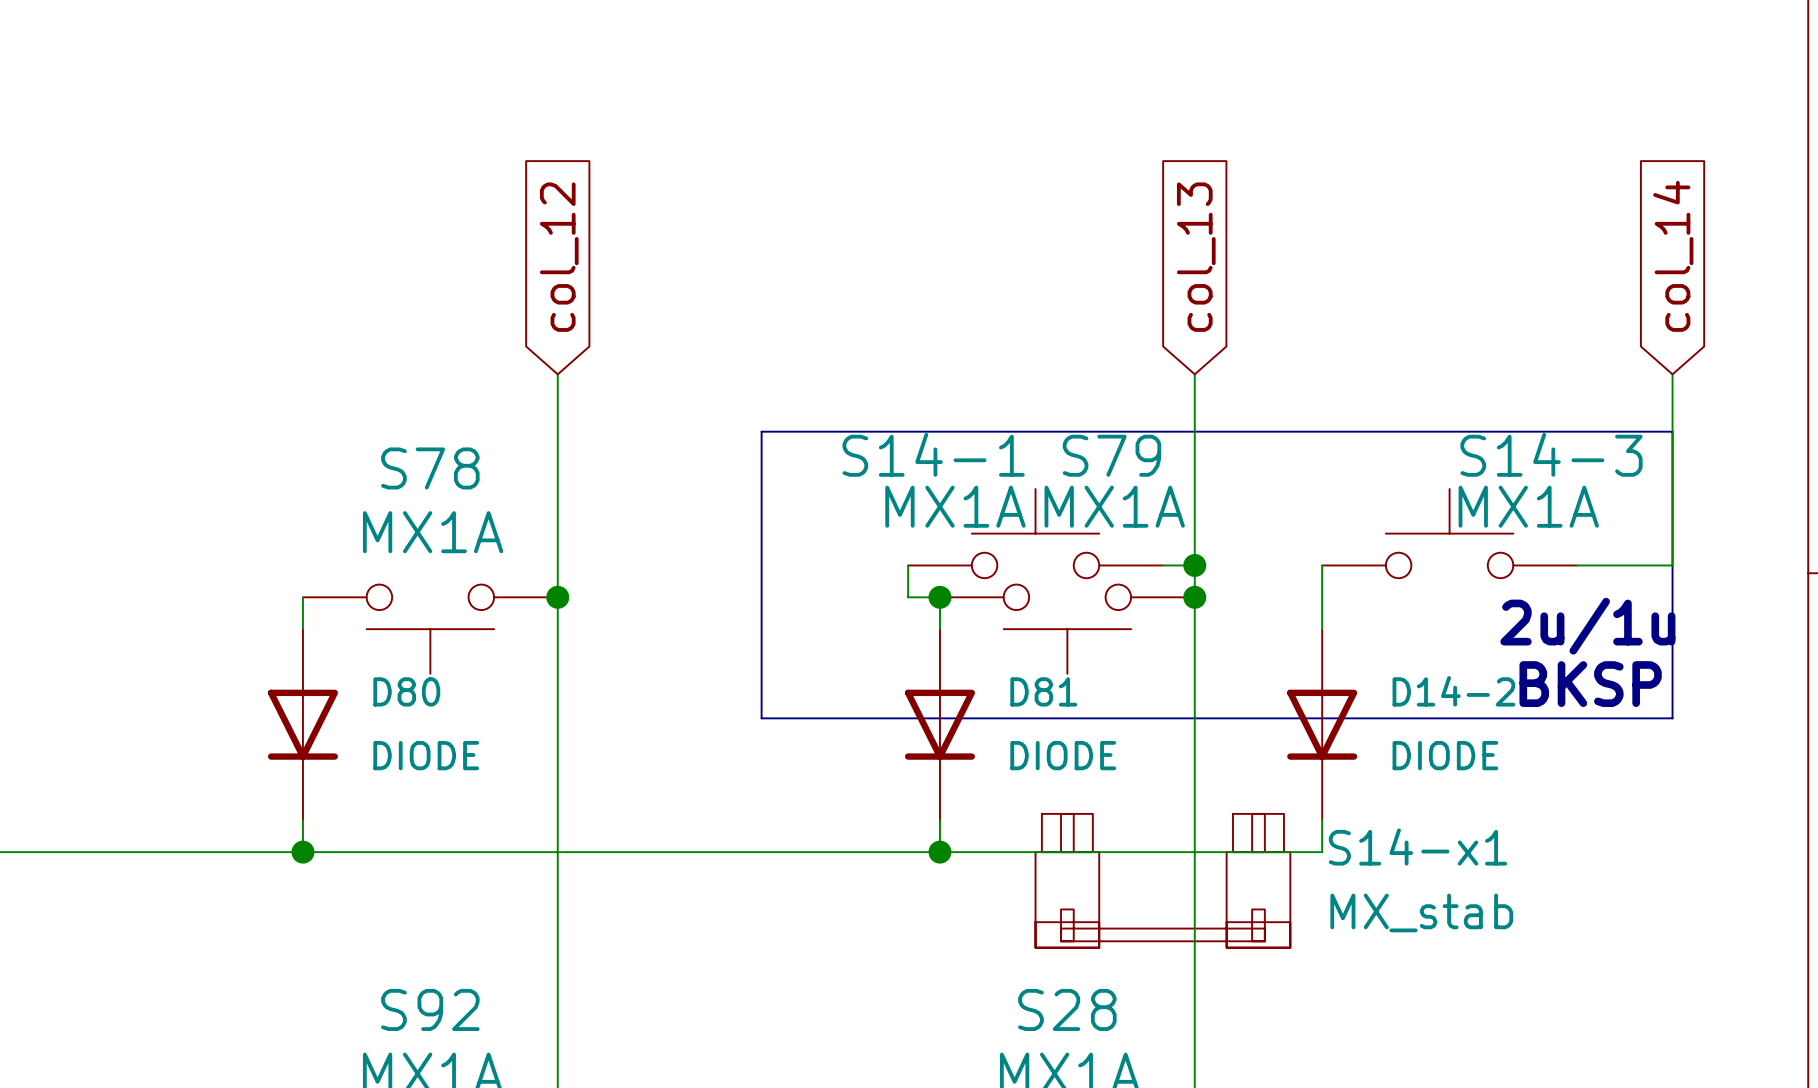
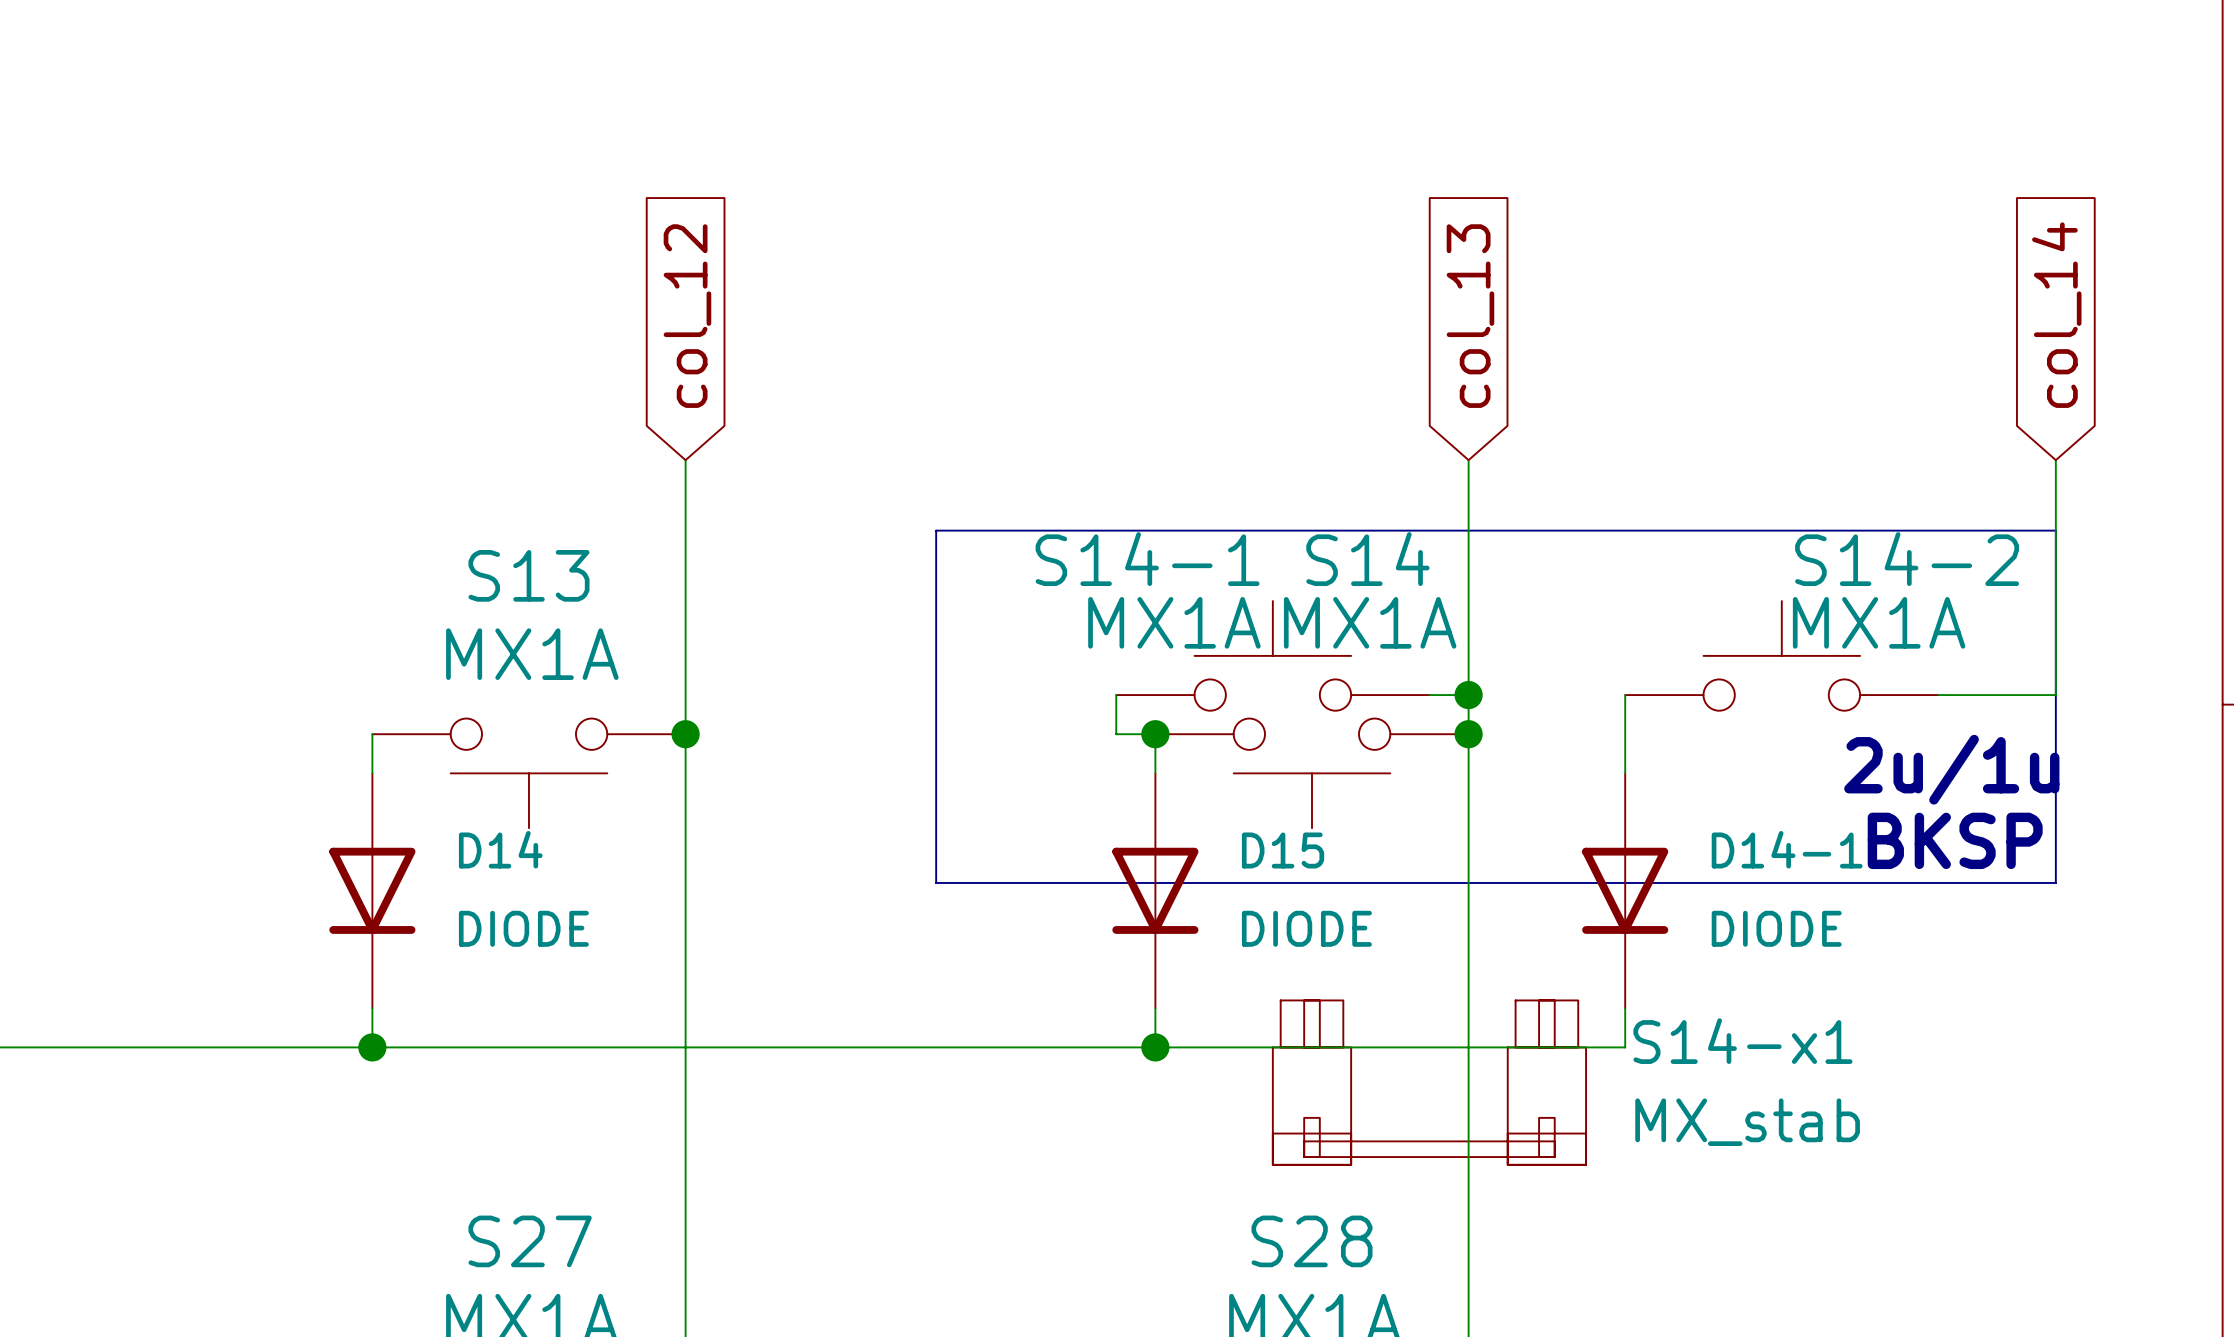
S14-3 name: S14-3 (1551, 454) -> S14-2 (1907, 559)
S79 name: S79 (1111, 455) -> S14 (1367, 559)
S78 name: S78 (430, 468) -> S13 (528, 575)
D80 name: D80 (406, 691) -> D14 (500, 849)
D81 name: D81 (1043, 691) -> D15 (1283, 850)
D14-2 name: D14-2 (1453, 691) -> D14-1 (1787, 849)
S92 name: S92 (430, 1009) -> S27 (530, 1241)

